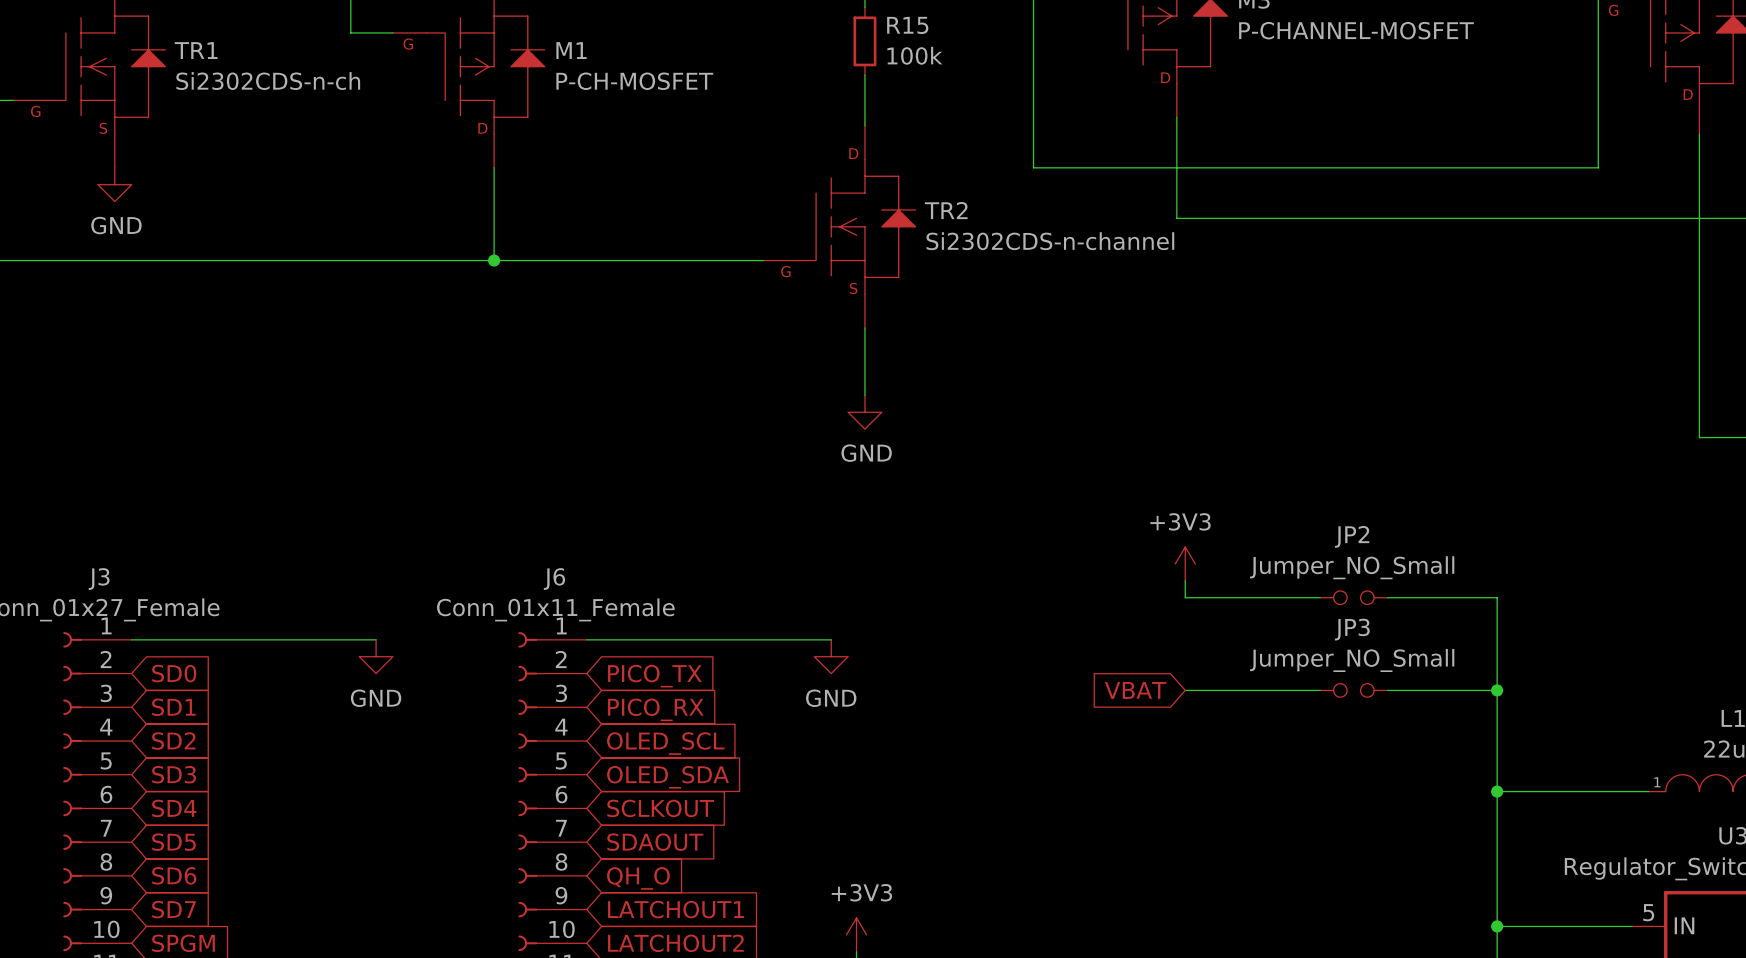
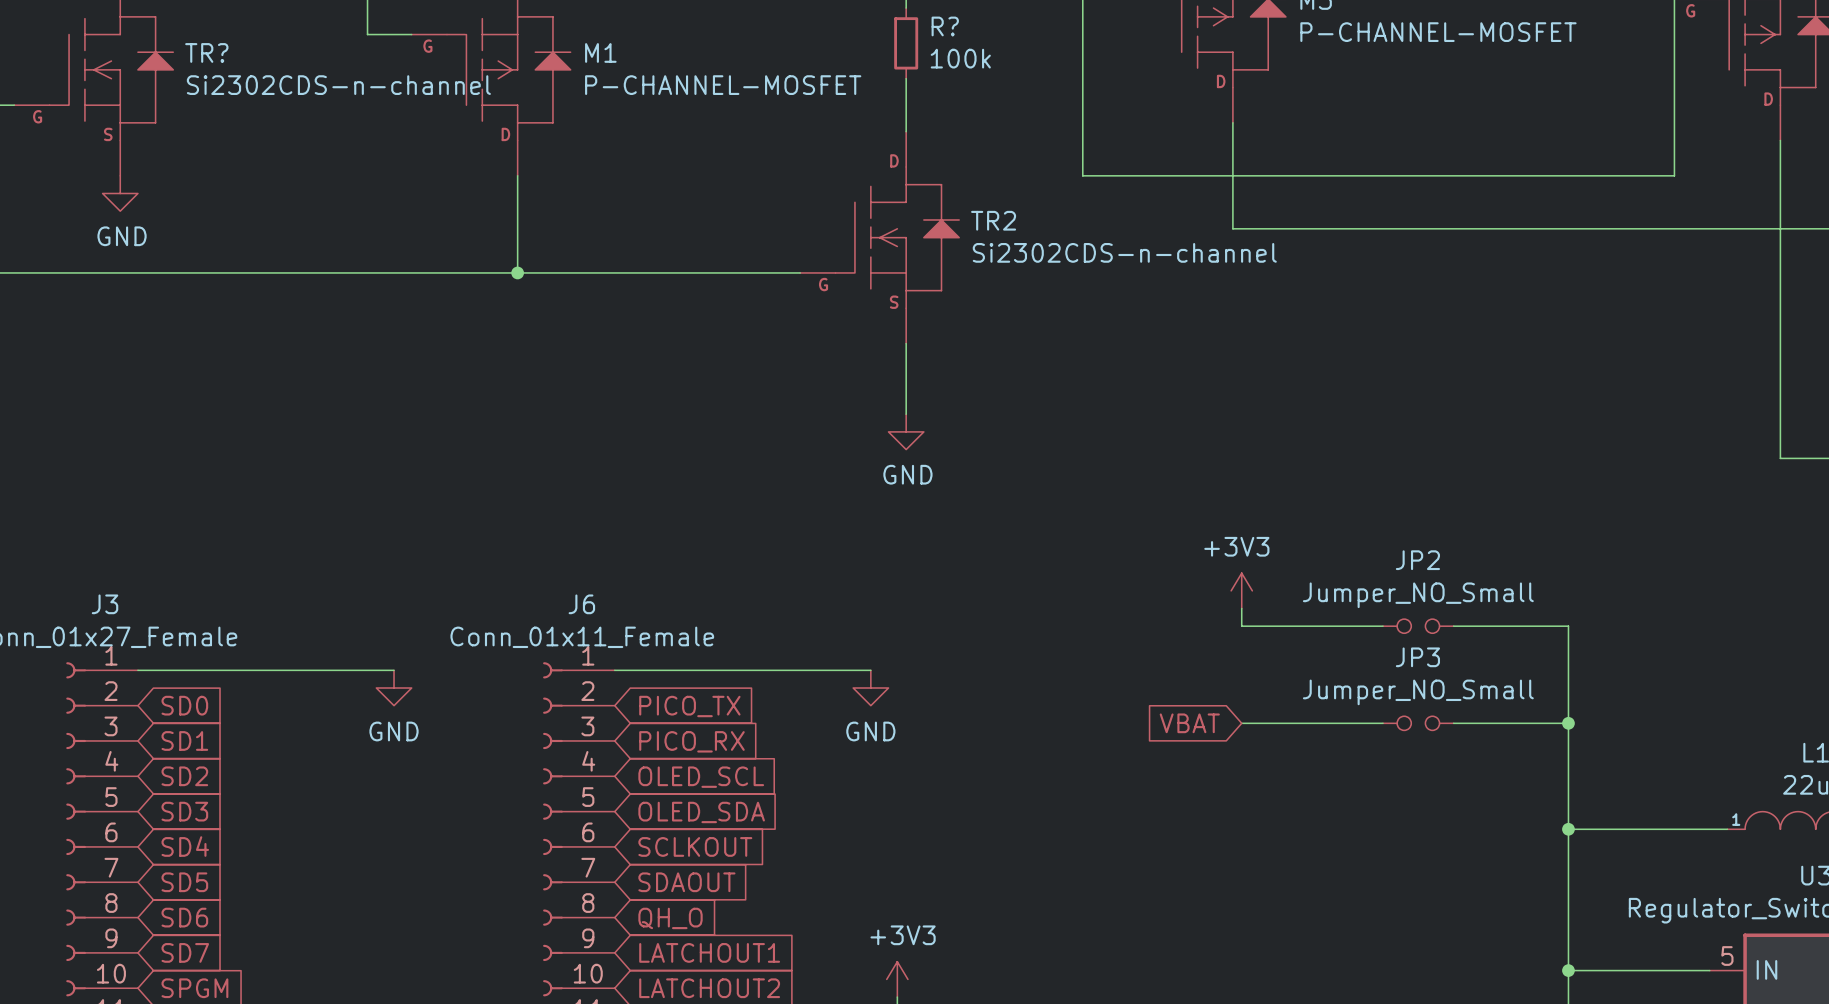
R15 name: R15 (907, 25) -> R? (945, 26)
TR1 name: TR1 (196, 50) -> TR? (206, 52)
TR1 value: Si2302CDS-n-ch (268, 81) -> Si2302CDS-n-channel (338, 85)
M1 value: P-CH-MOSFET (634, 81) -> P-CHANNEL-MOSFET (723, 85)

